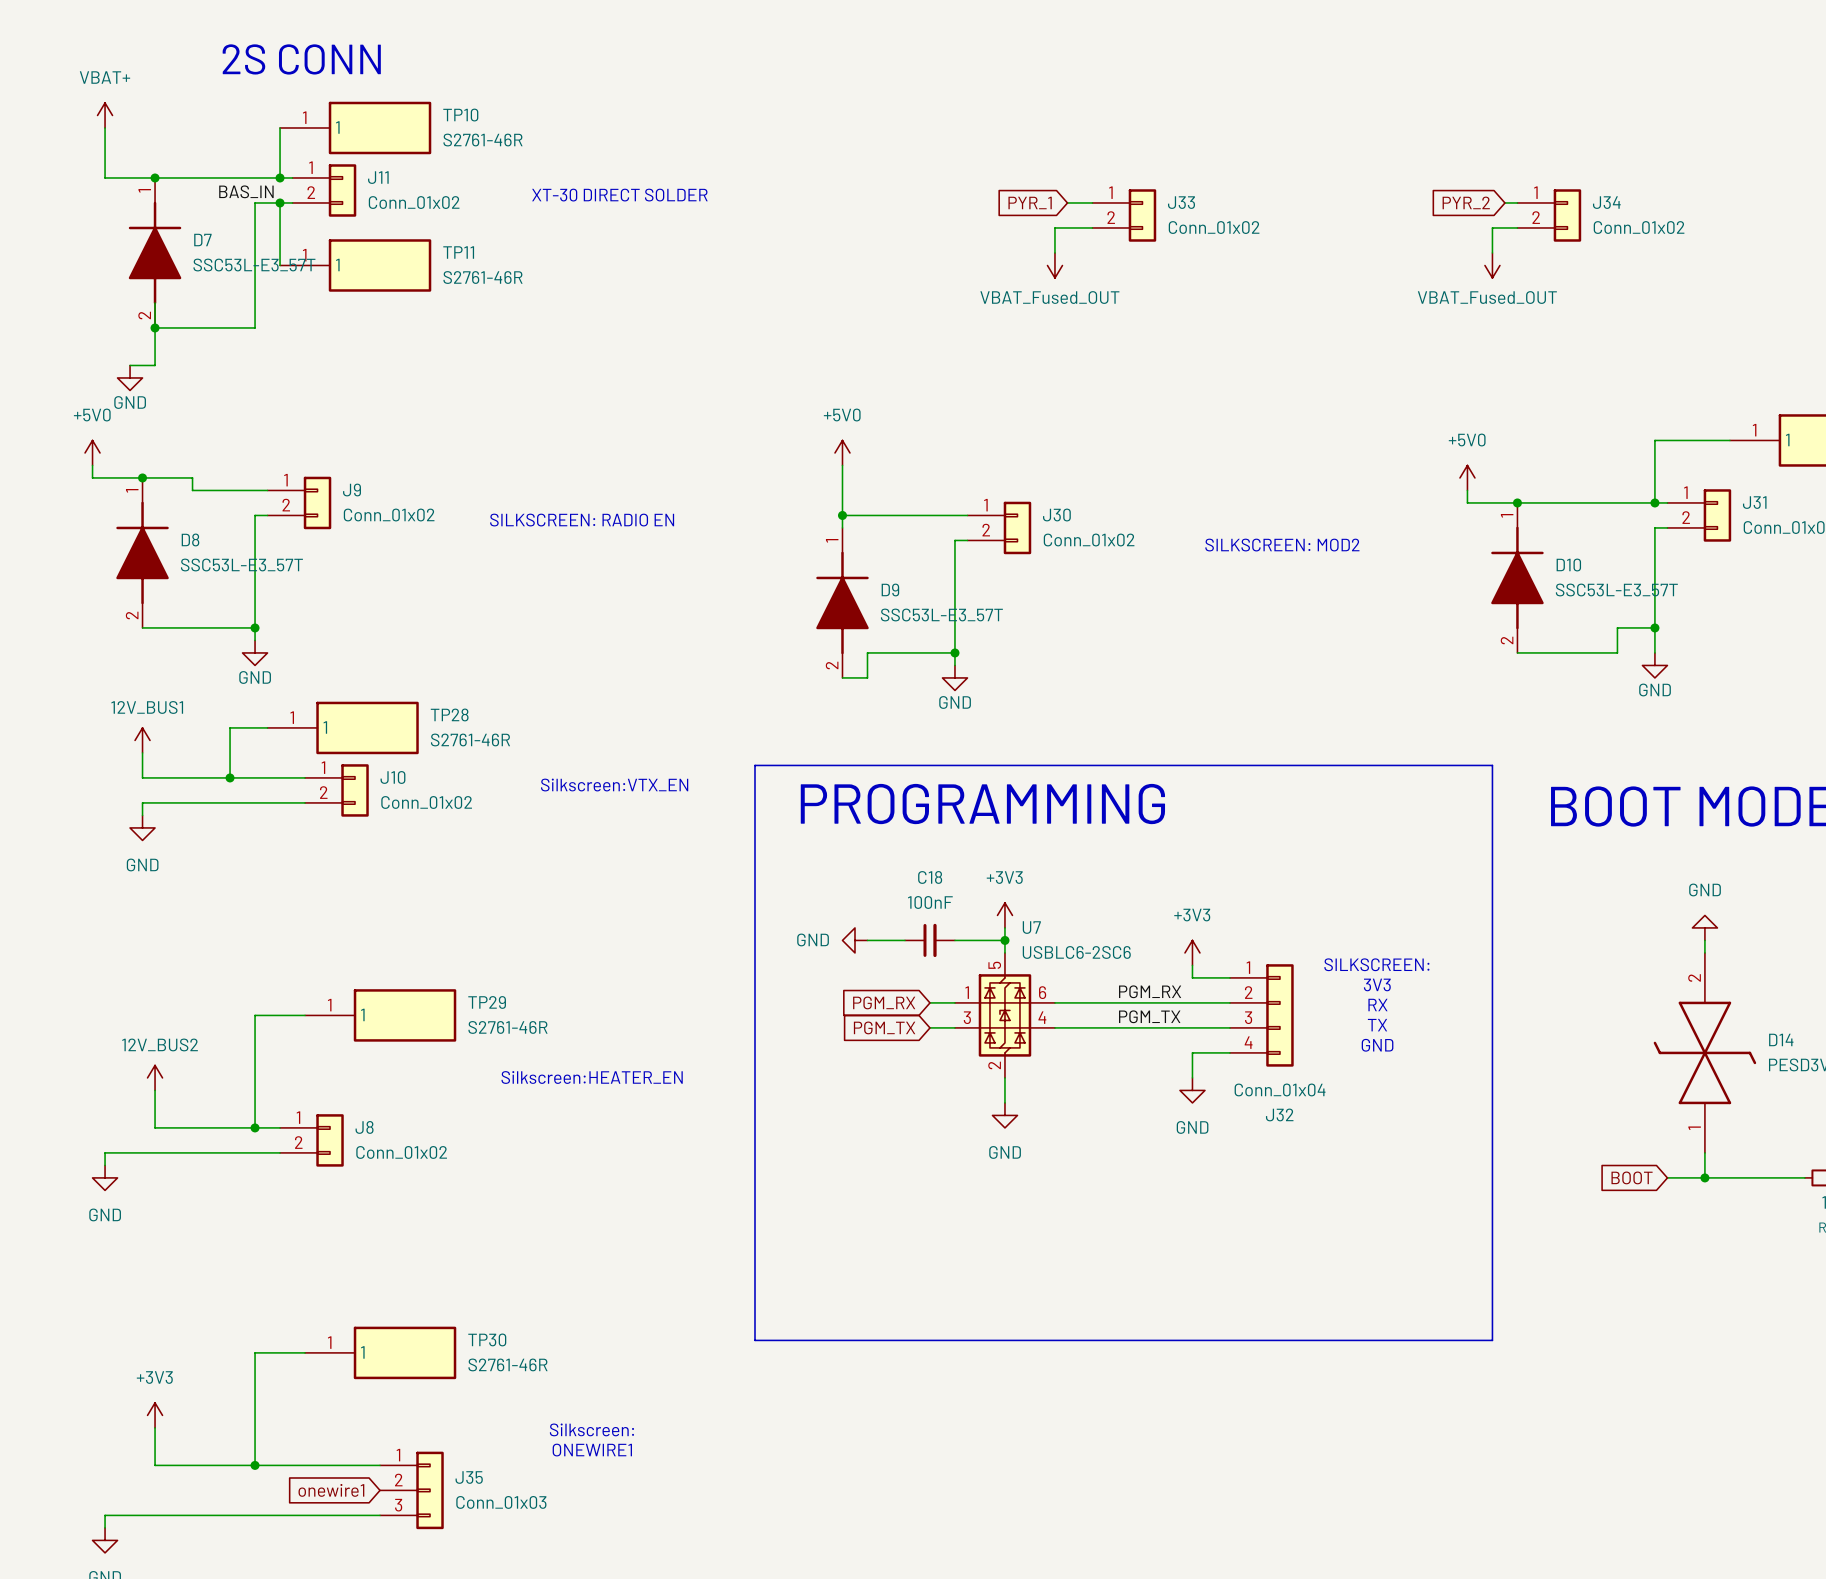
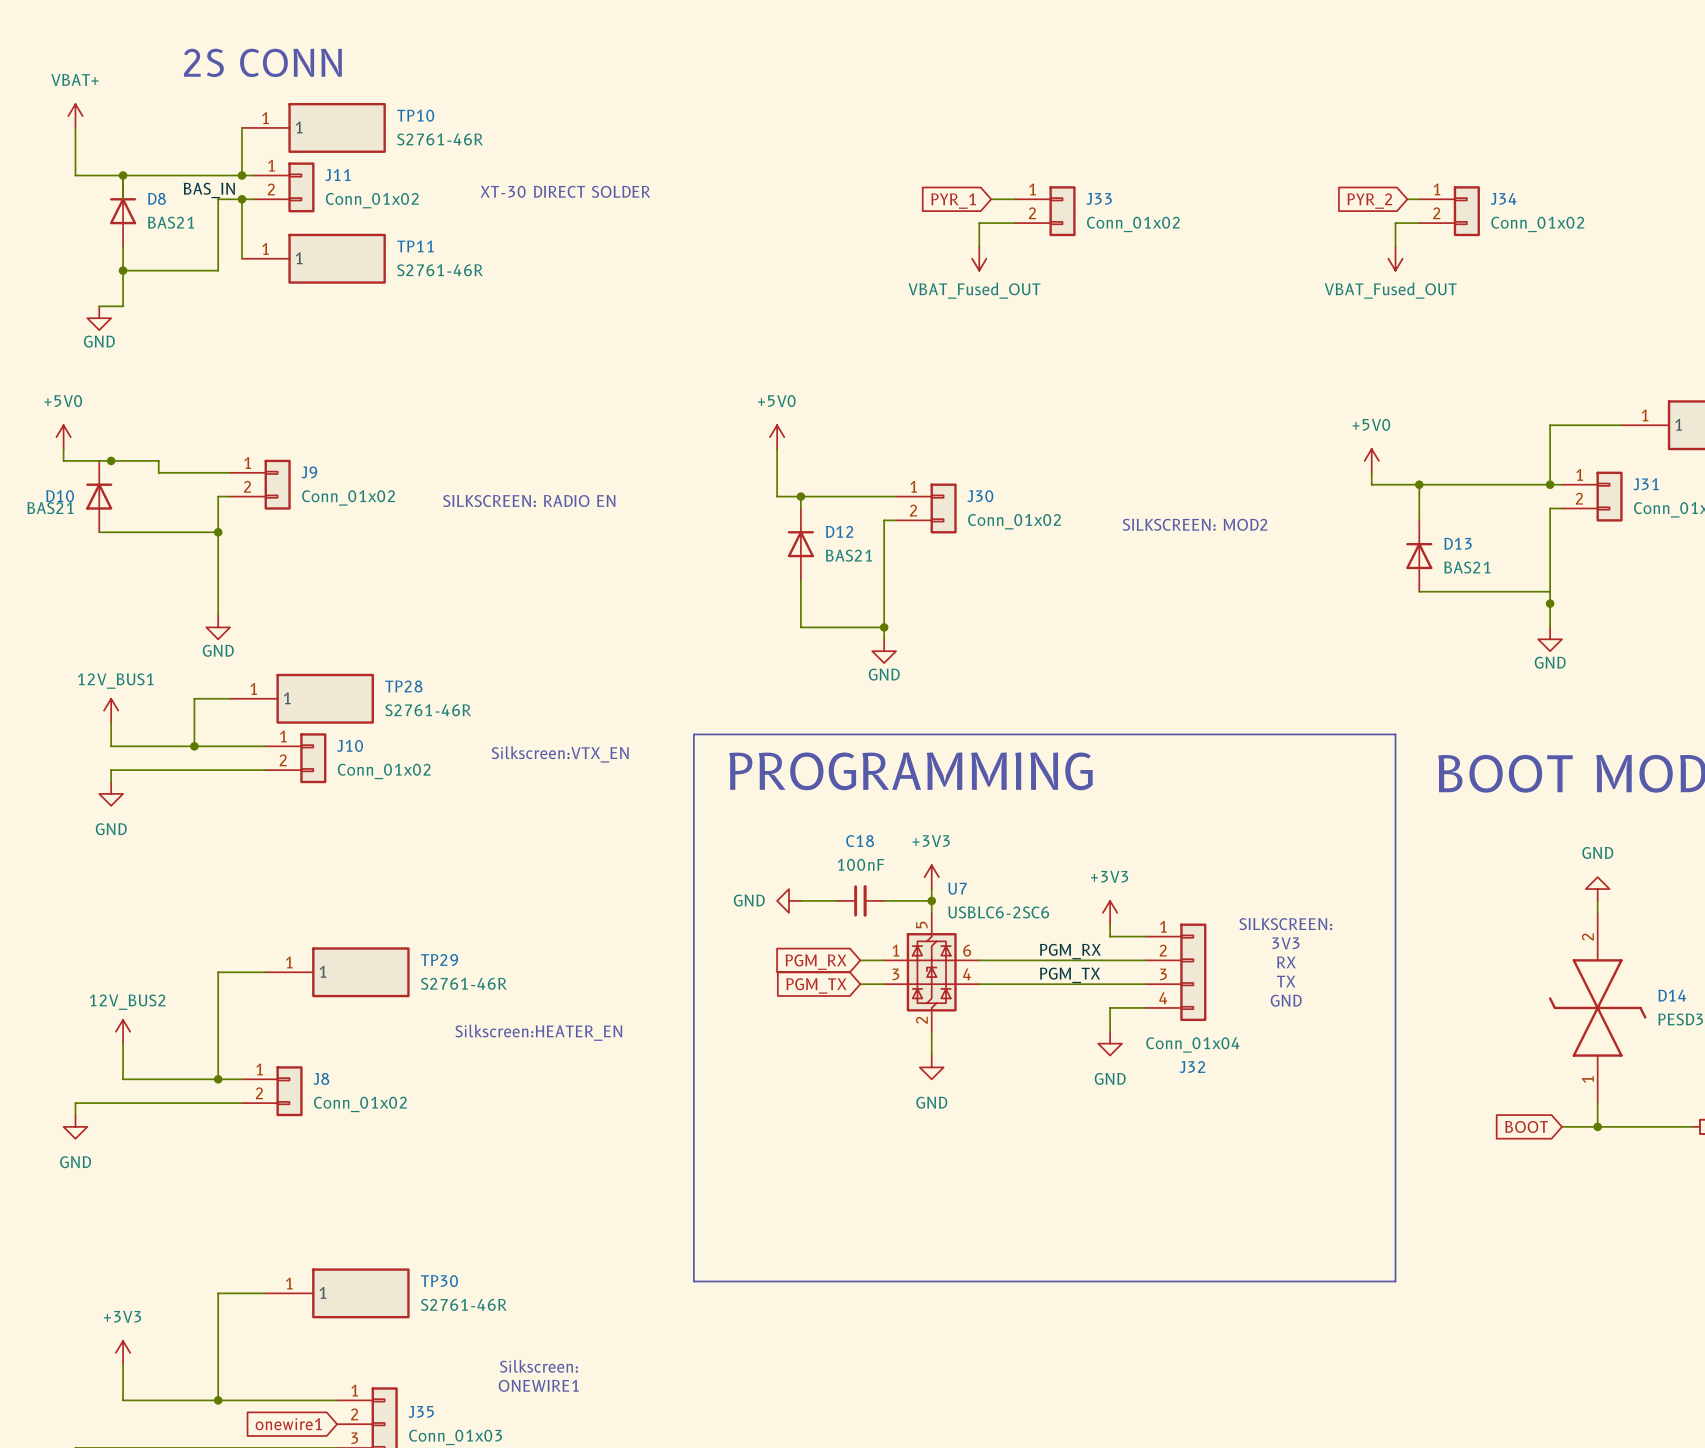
D7: SSC53L-E3_57T (155, 252) -> none
wire: (255, 277) (255, 327) (155, 327) -> (218, 270) (123, 270)
wire: (155, 315) (155, 365) (130, 365) -> (123, 306) (99, 306)
junction position: (155, 327) -> (123, 270)
power symbol position: GND (130, 377) -> GND (99, 318)
D8 symbol: [116, 477, 169, 628] -> [109, 175, 137, 247]
D10 symbol: [1491, 502, 1544, 653] -> [86, 460, 113, 533]
wire: (842, 515) (842, 527) -> (800, 496) (800, 508)
junction position: (842, 515) -> (800, 496)
wire: none -> (99, 532) (218, 532)
junction: none -> (218, 532)
D8 value: SSC53L-E3_57T (241, 565) -> BAS21 (171, 222)
D12: none -> BAS21 (800, 544)
D10 name position: D10 (1568, 565) -> D10 (60, 496)
D13: none -> BAS21 (1419, 556)
D10 value: SSC53L-E3_57T (1616, 590) -> BAS21 (50, 508)
D9: SSC53L-E3_57T (842, 602) -> none
wire: none -> (1419, 591) (1550, 591)
wire: (142, 627) (255, 627) -> none
junction: (255, 627) -> none
wire: (1654, 627) (1617, 627) (1617, 652) (1517, 652) -> none
wire: (867, 652) (867, 677) (842, 677) -> (800, 627) (800, 579)

